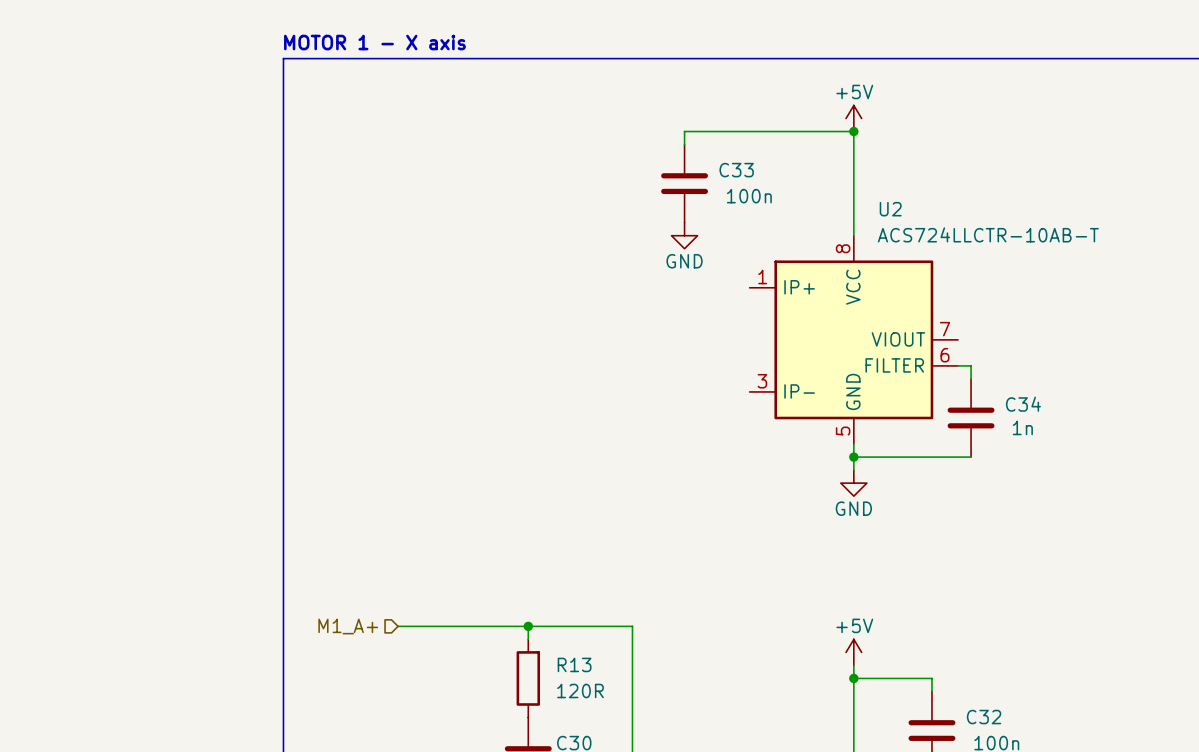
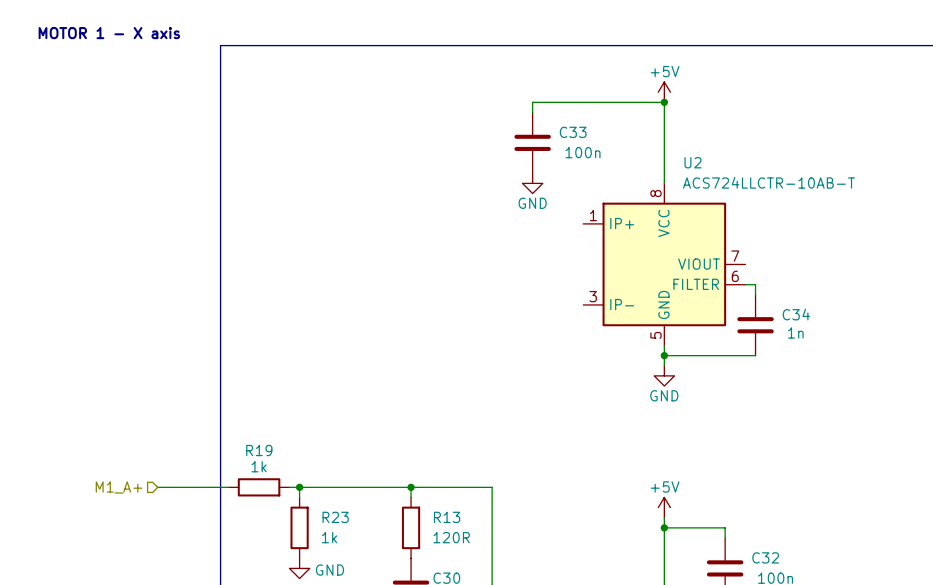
text position: MOTOR 1 - X axis (374, 42) -> MOTOR 1 - X axis (109, 33)
wire: none -> (157, 487) (228, 487)
R19: none -> 1k (259, 487)
hierarchical label position: M1_A+ (348, 626) -> M1_A+ (118, 487)
wire: none -> (289, 487) (309, 487)
junction: none -> (299, 487)
R23: none -> 1k (299, 527)
power symbol: none -> GND (299, 568)

